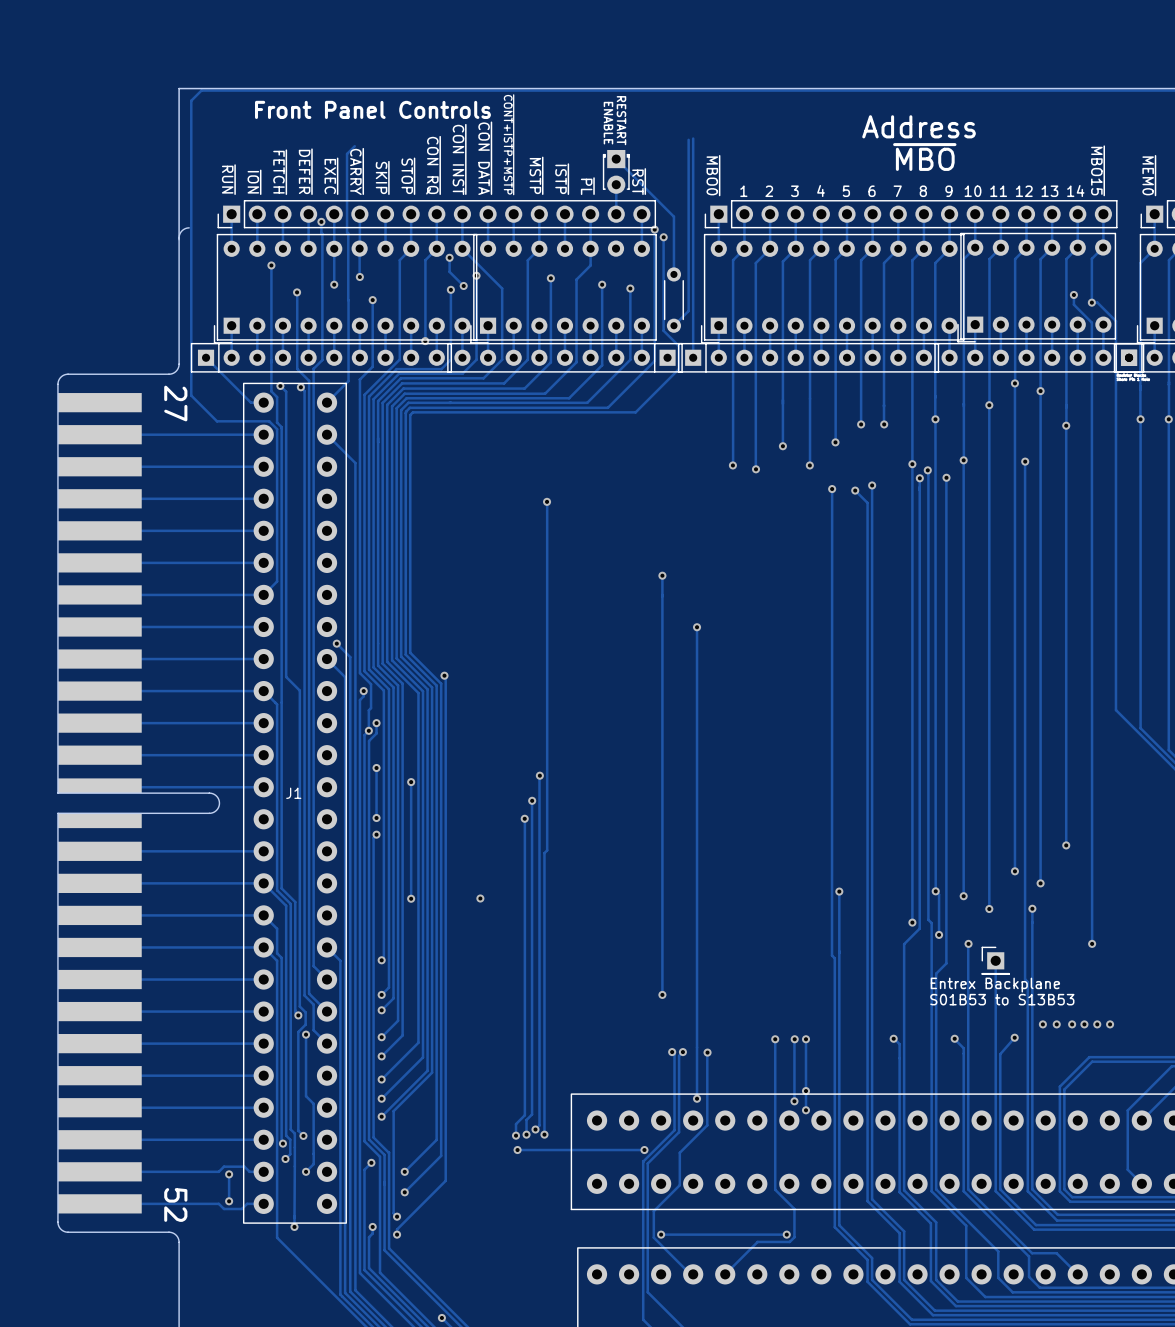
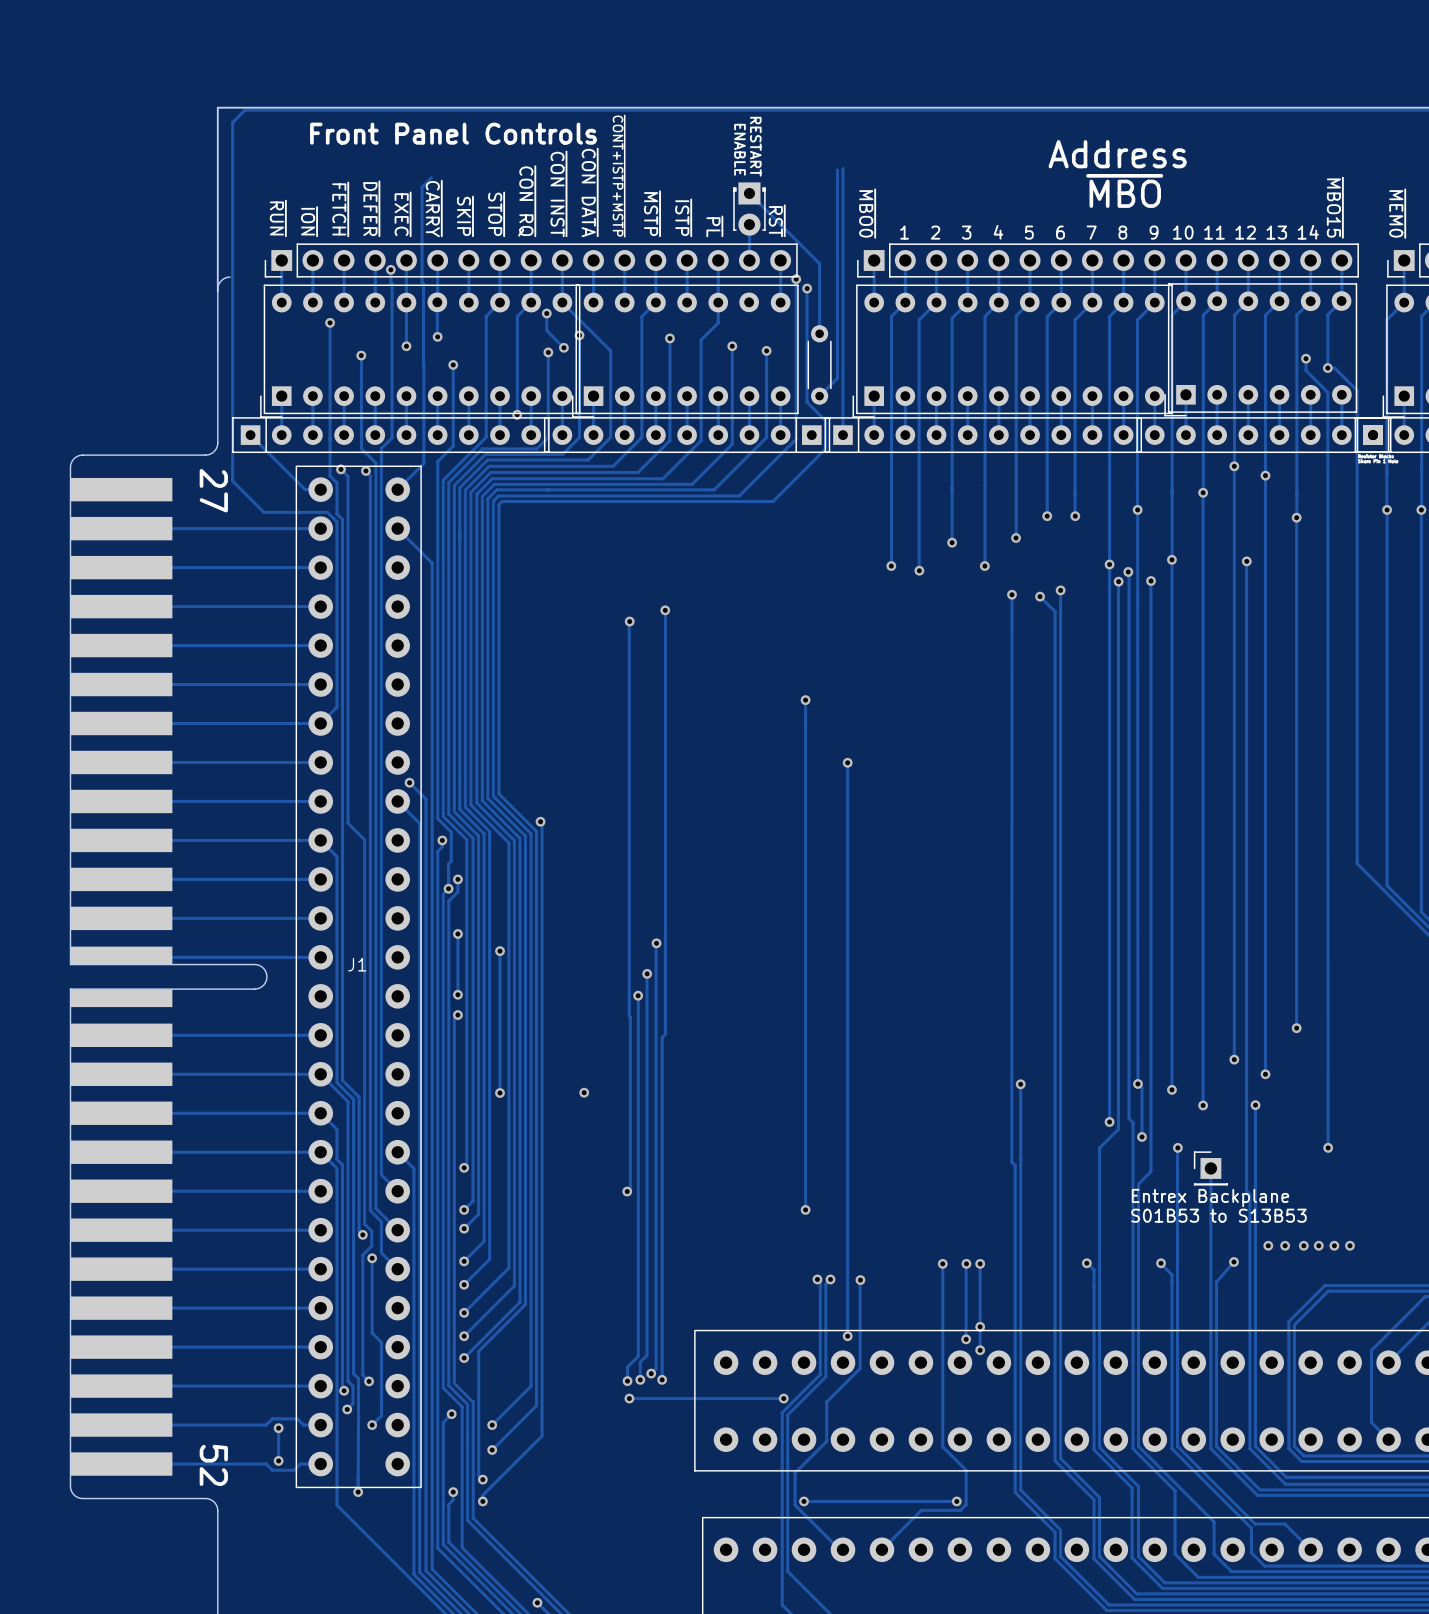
track: none -> (629, 620) (630, 1188) (627, 1191)
via: none -> (629, 621)
via: none -> (627, 1191)

